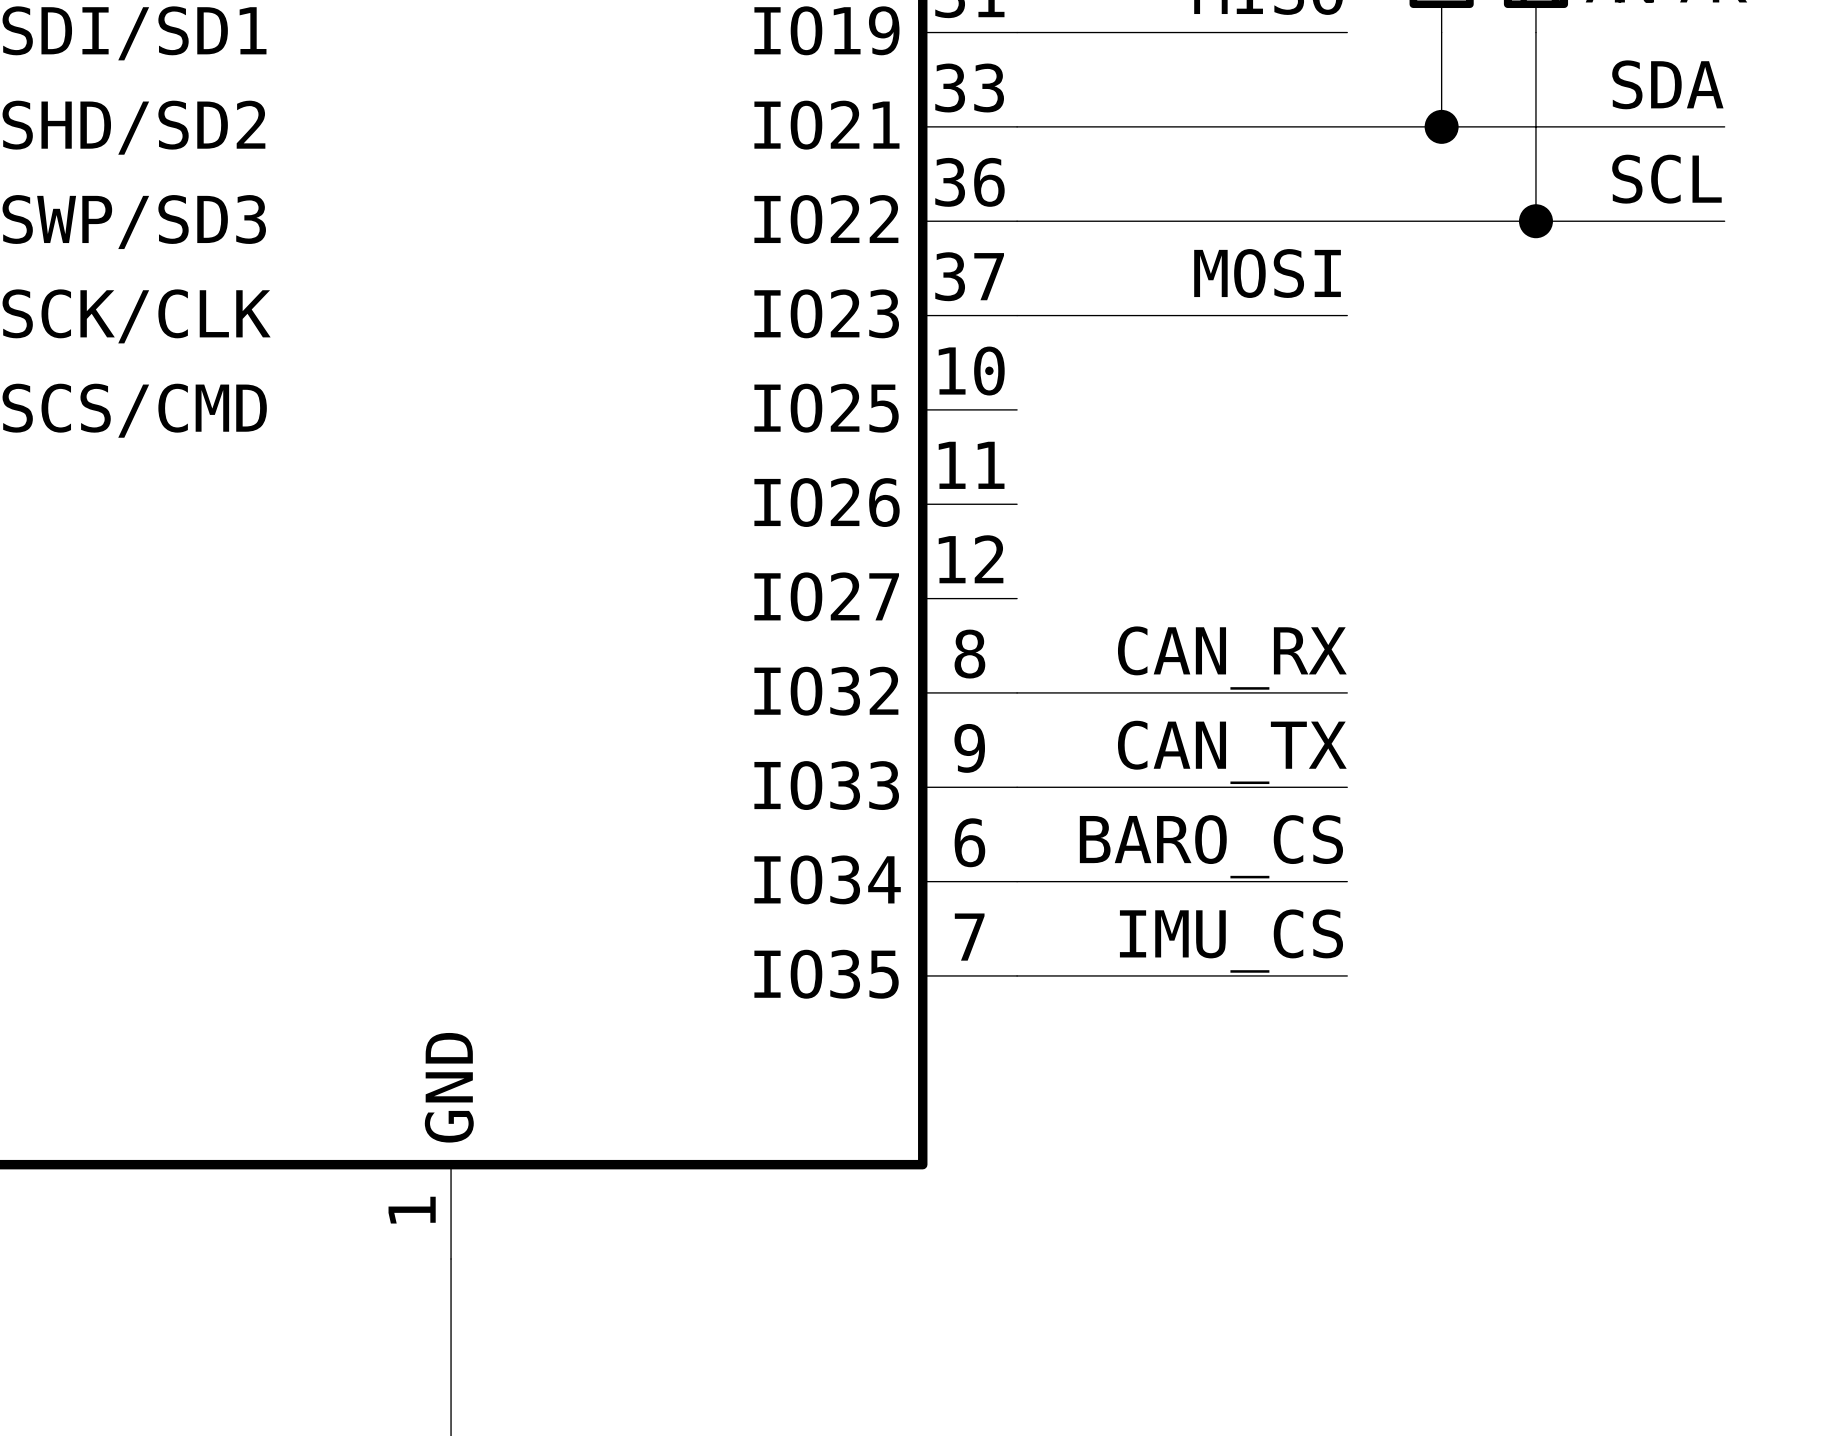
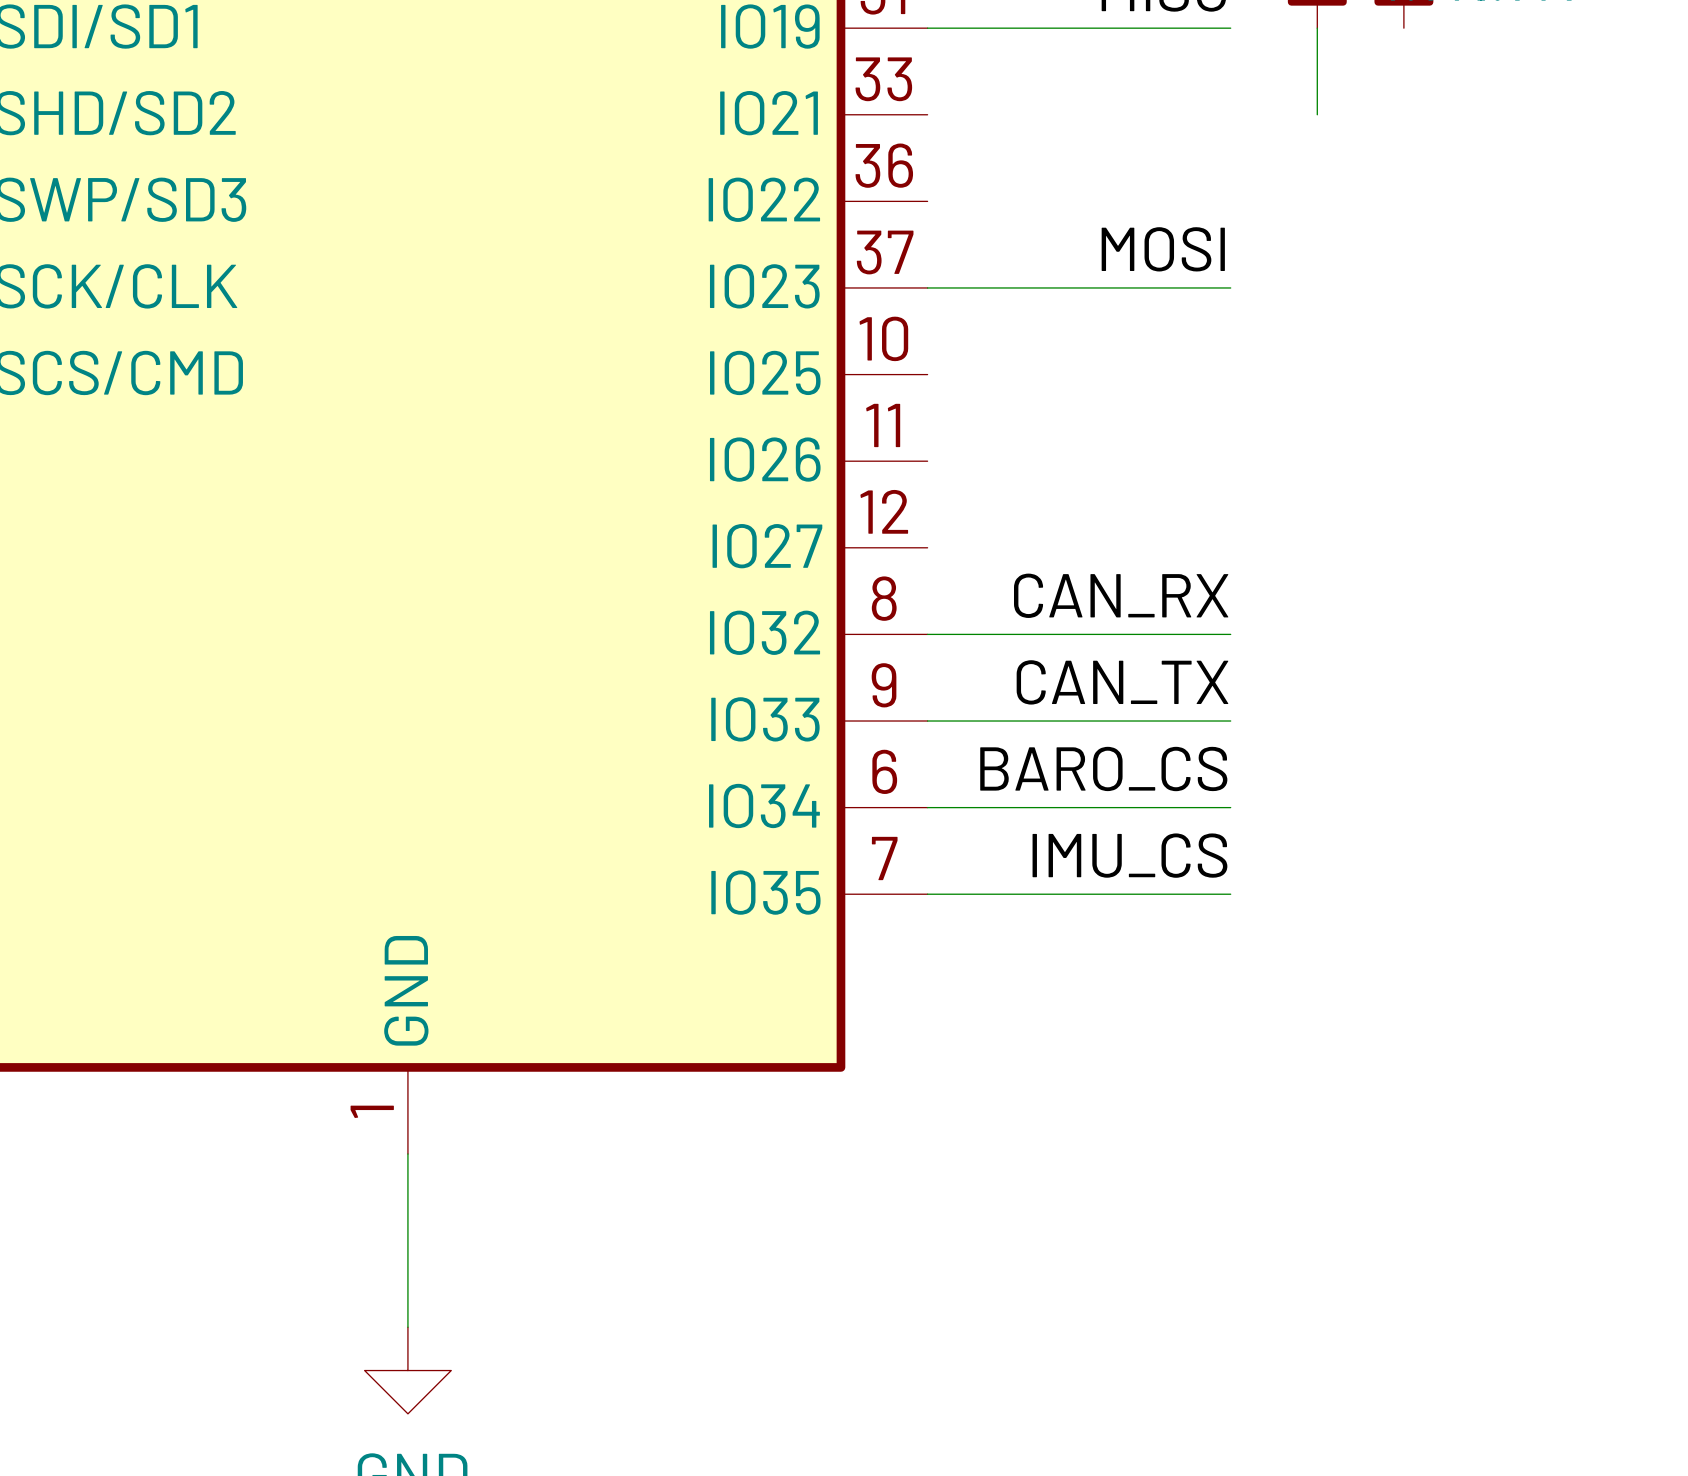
wire: (1535, 32) (1535, 221) -> none
label: SDA (1667, 84) -> none
wire: (1017, 126) (1724, 126) -> none
junction: (1441, 126) -> none
label: SCL (1666, 179) -> none
wire: (1017, 221) (1724, 221) -> none
junction: (1535, 221) -> none

